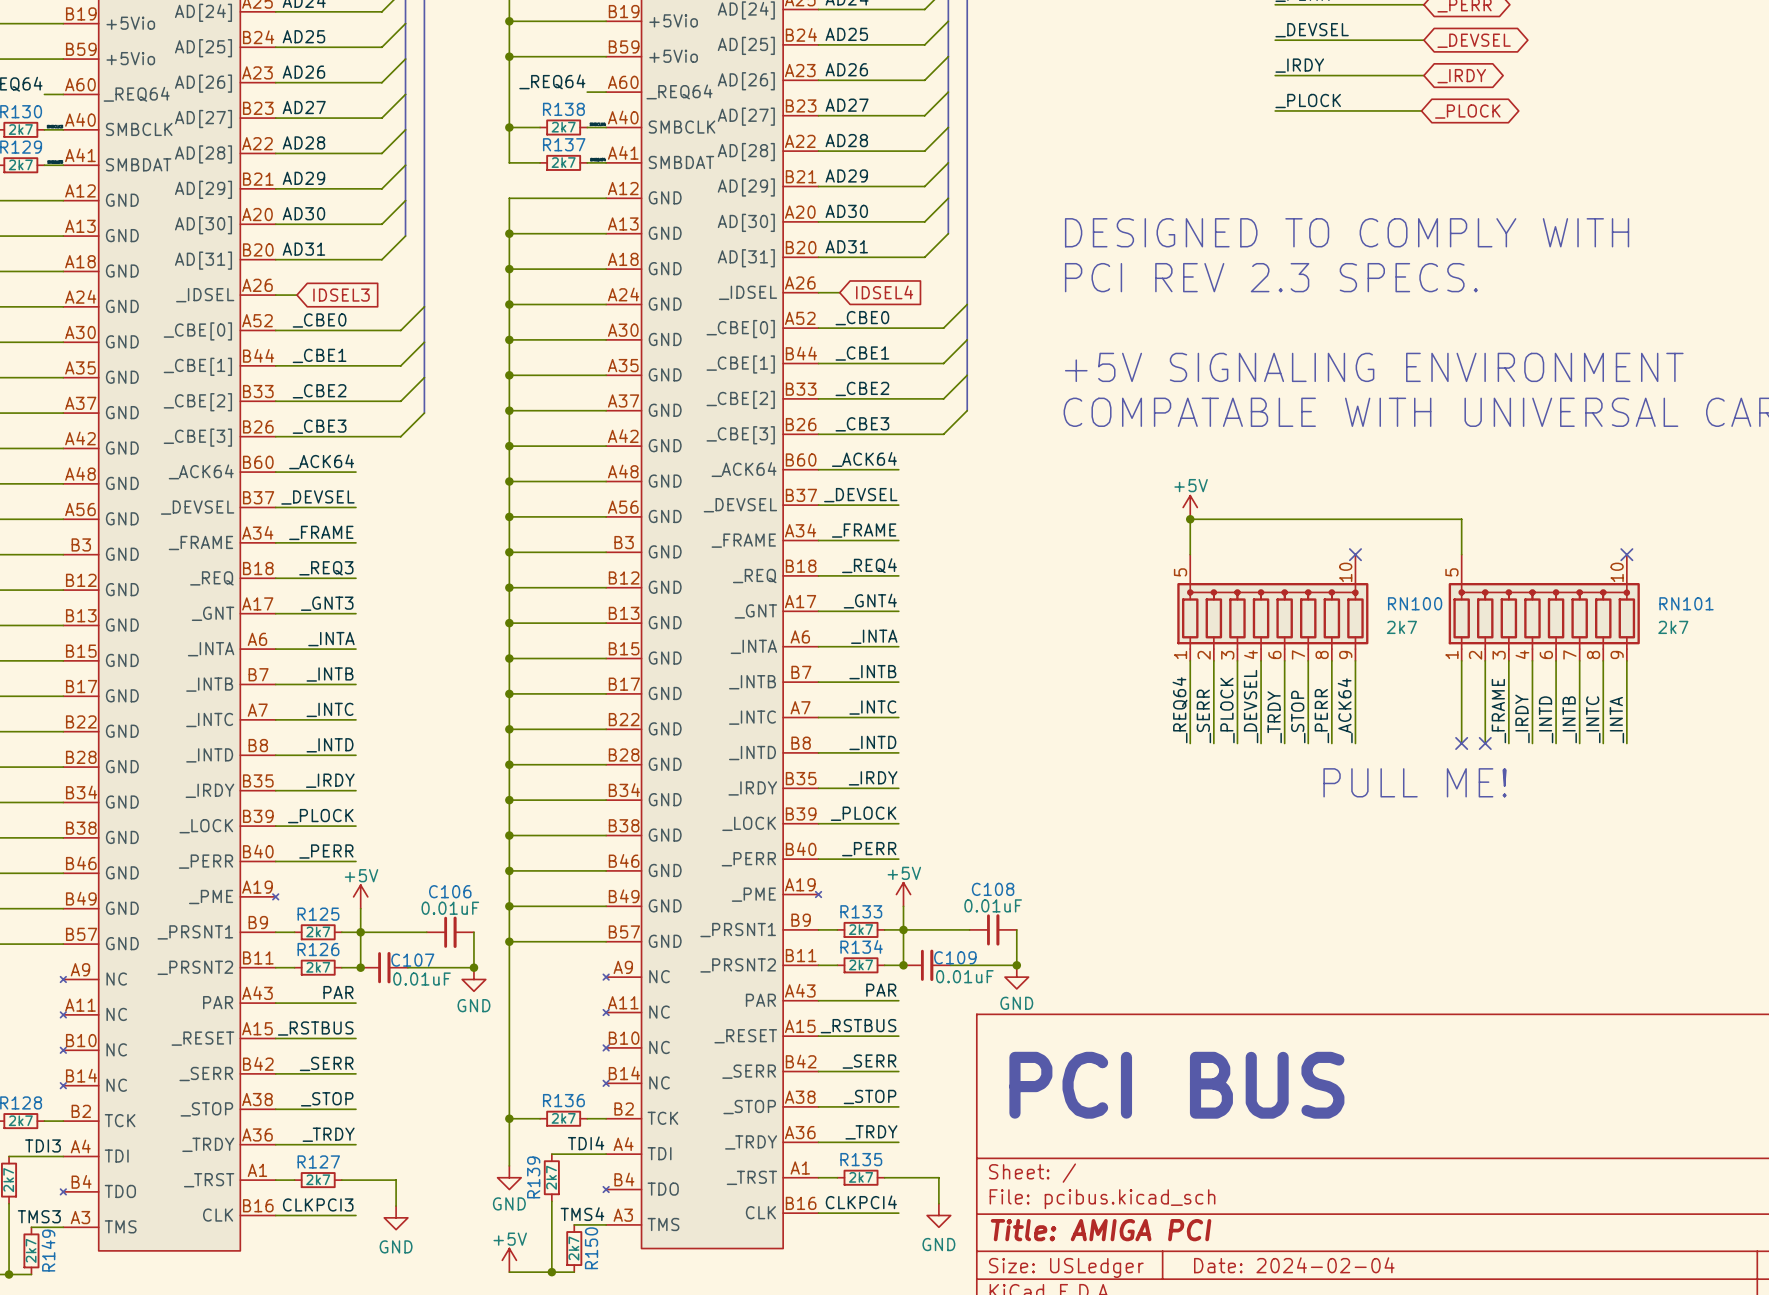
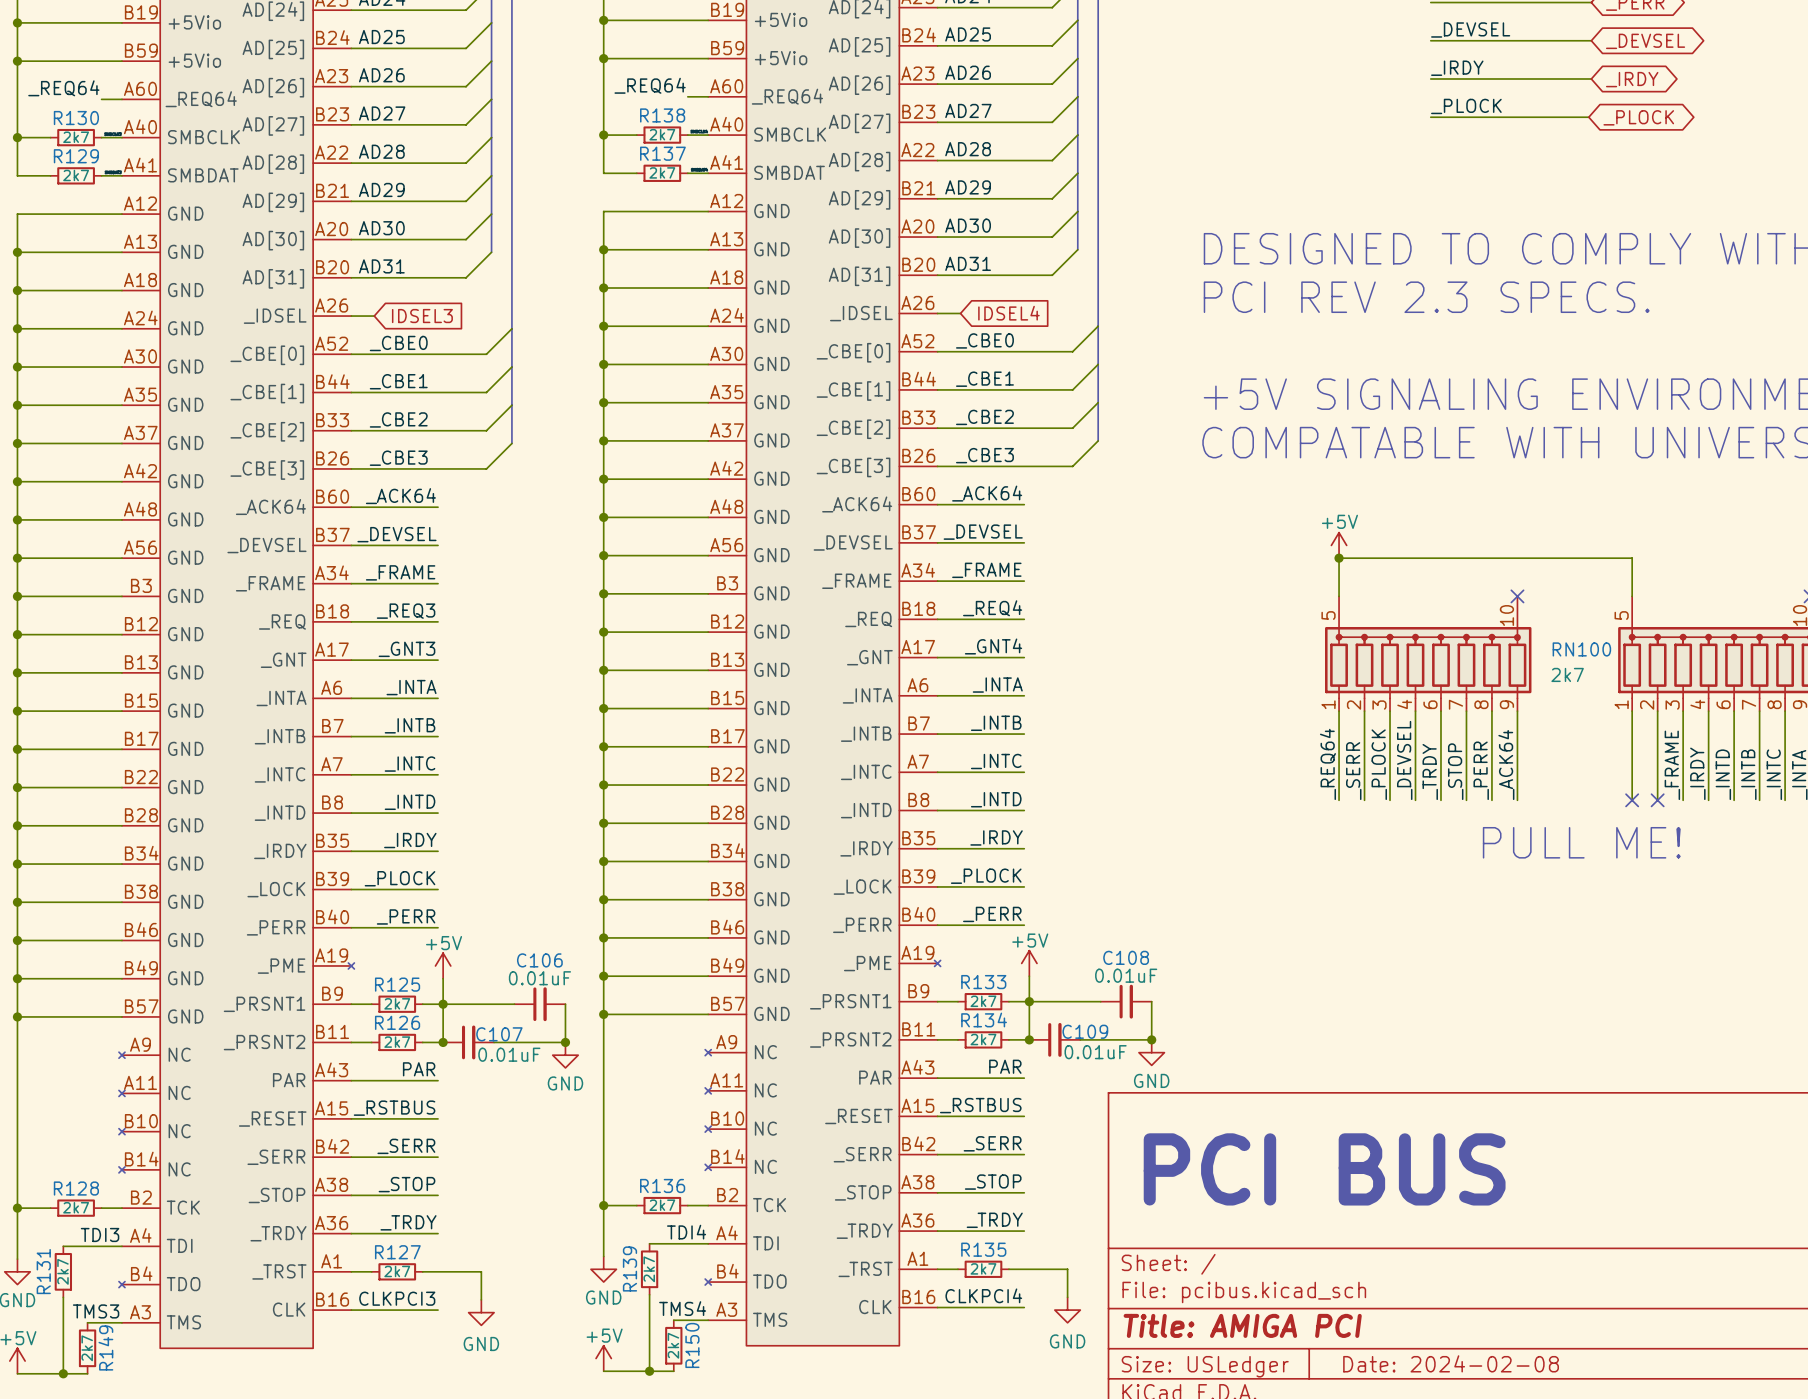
title block: Date: 2024-02-04 (1294, 1265) -> Date: 2024-02-08 (1451, 1363)

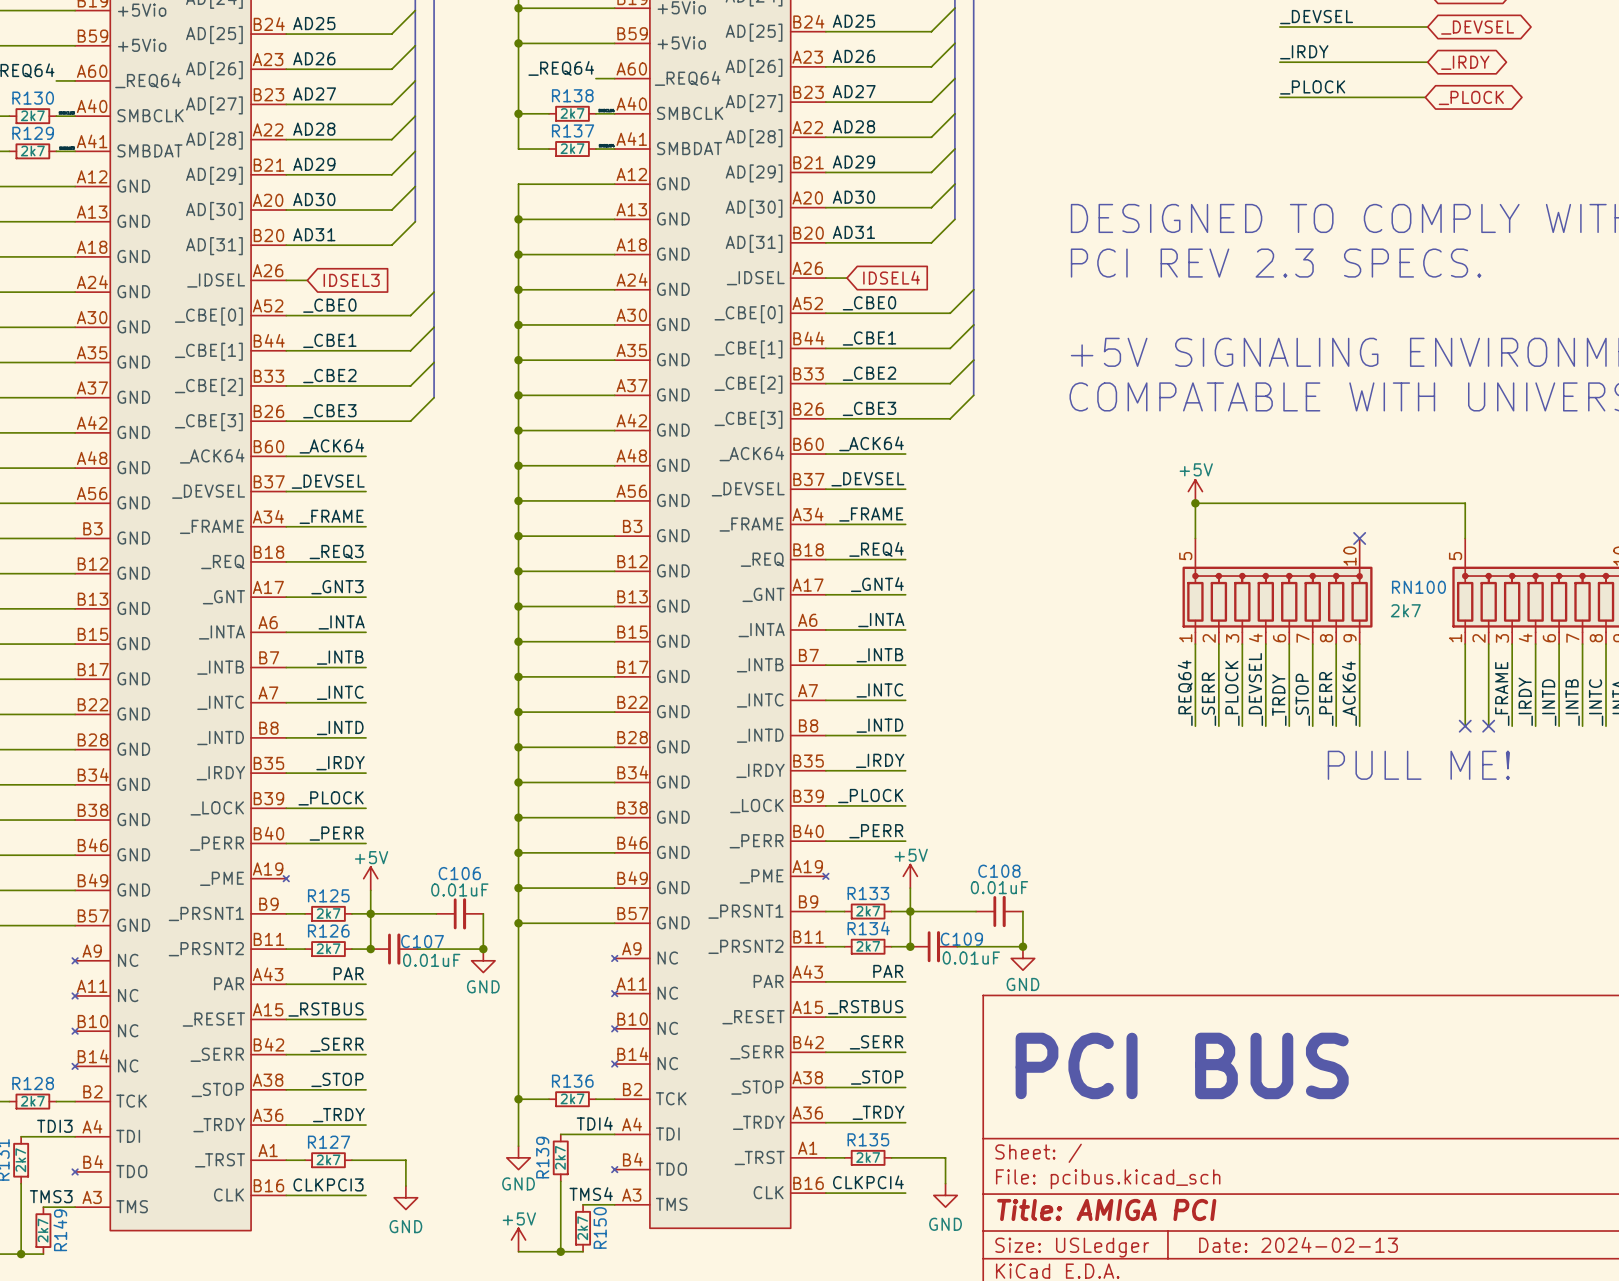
title block: Date: 2024-02-08 (1451, 1363) -> Date: 2024-02-13 (1298, 1244)

